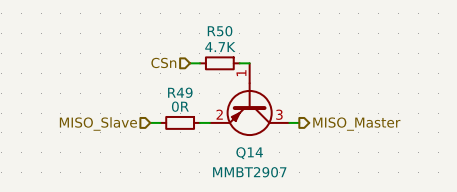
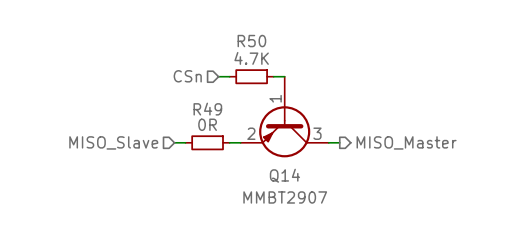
Q14 symbol: [209, 63, 290, 137] -> [240, 76, 329, 158]

